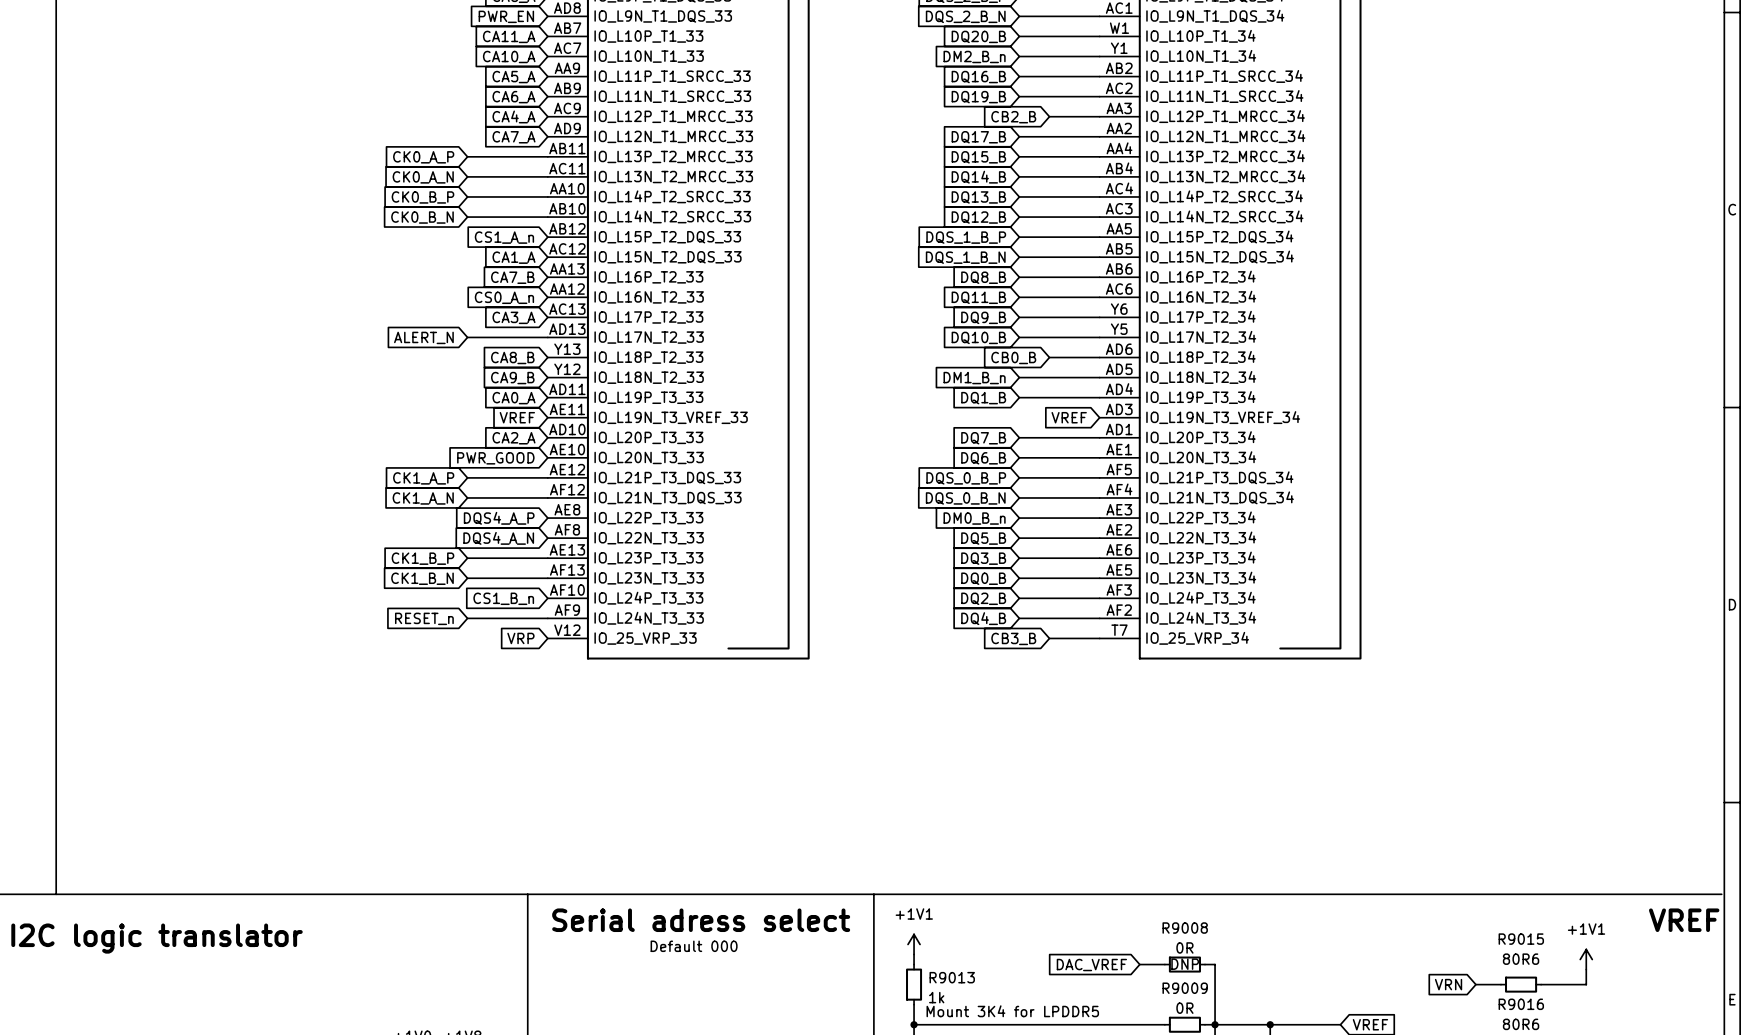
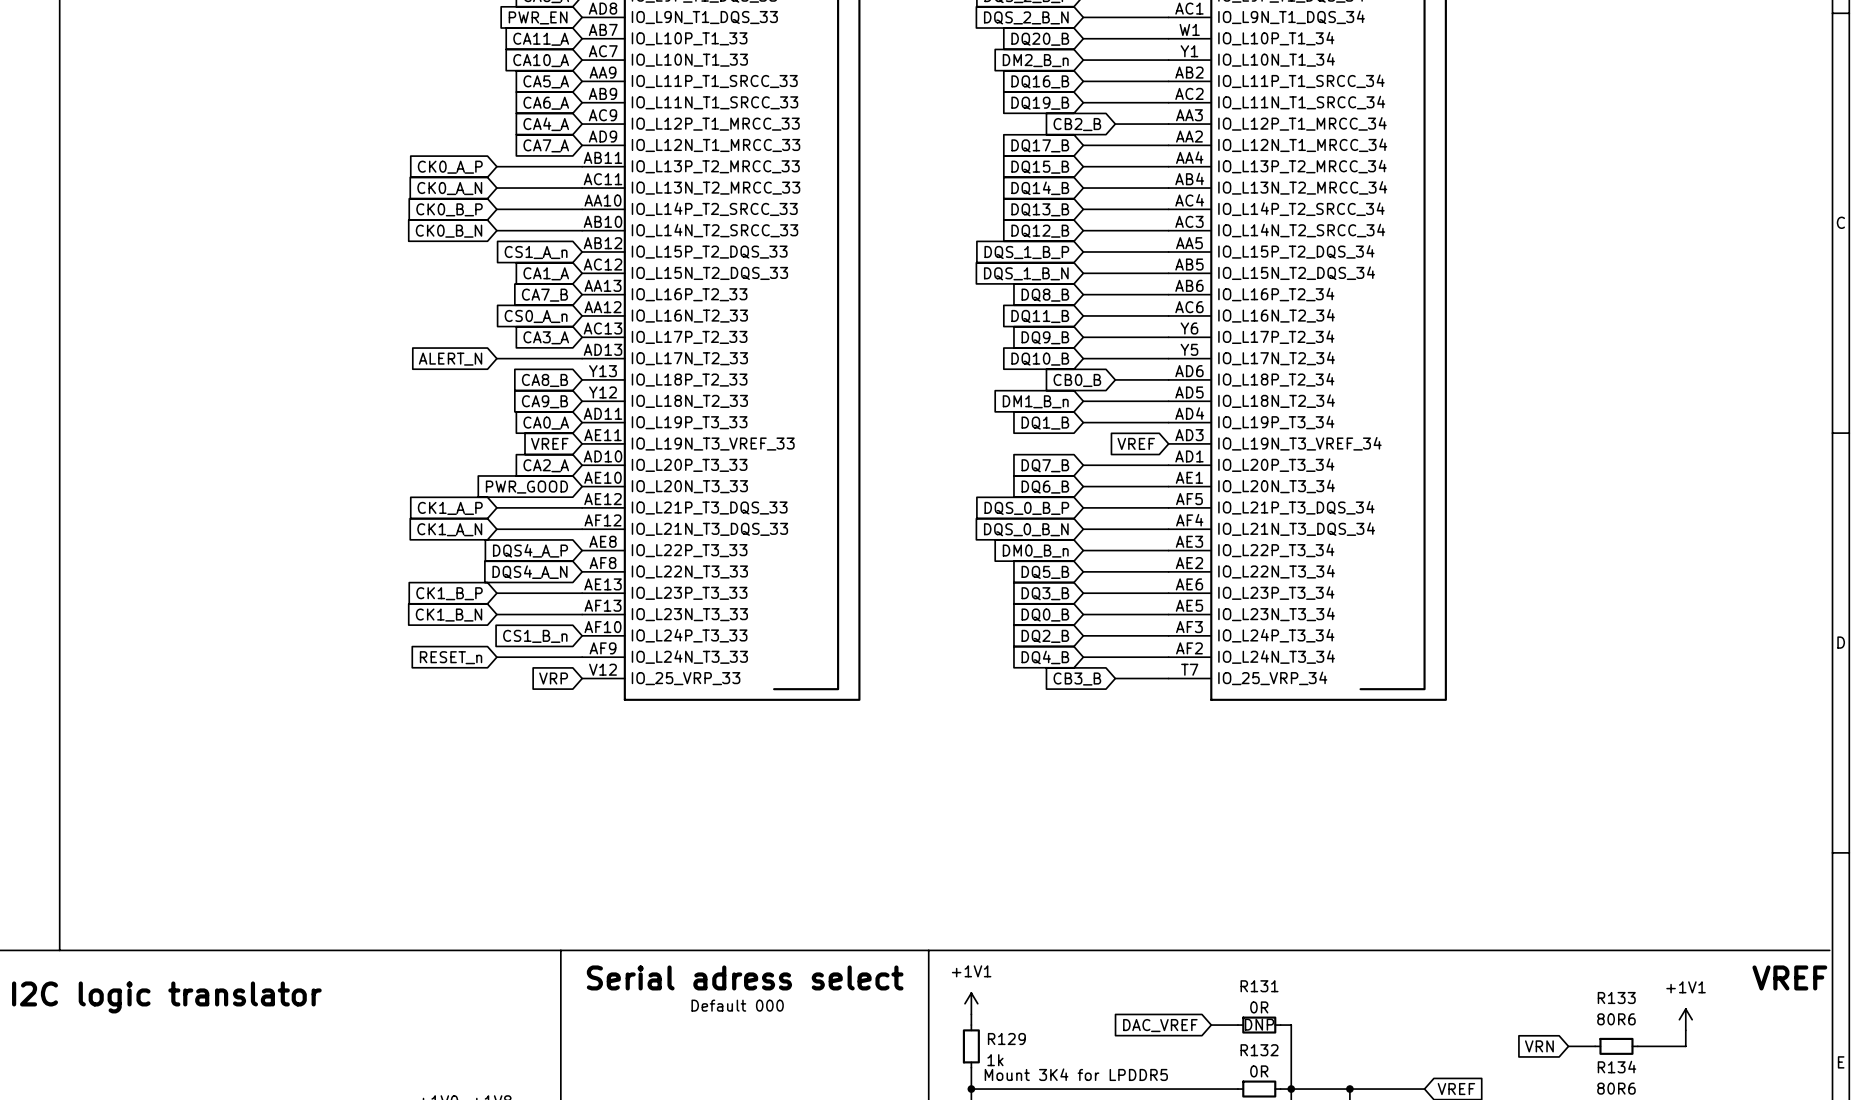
R9008 name: R9008 (1185, 928) -> R131 (1259, 986)
R9015 name: R9015 (1521, 939) -> R133 (1616, 998)
R9013 name: R9013 (952, 977) -> R129 (1006, 1039)
R9009 name: R9009 (1185, 988) -> R132 (1259, 1050)
R9016 name: R9016 (1521, 1004) -> R134 (1616, 1067)

